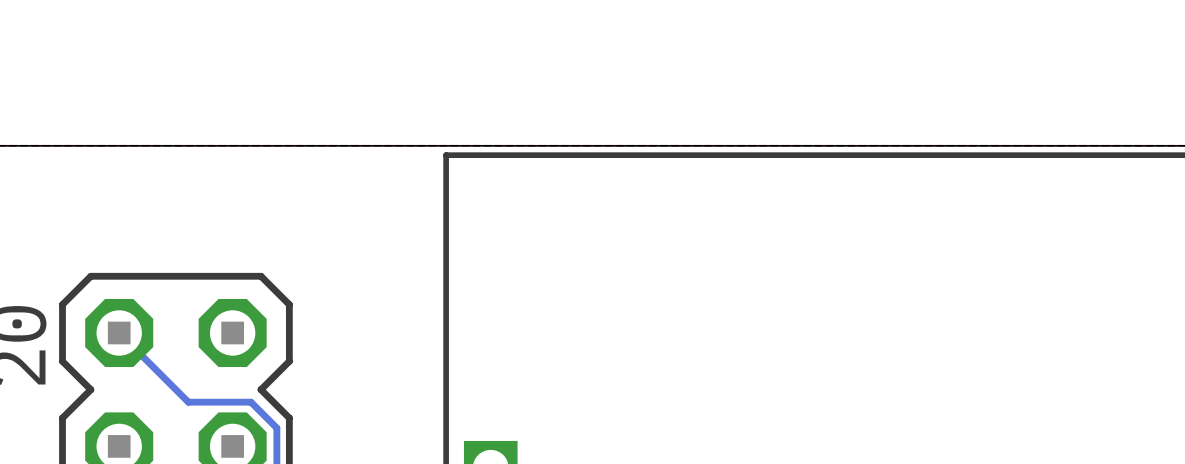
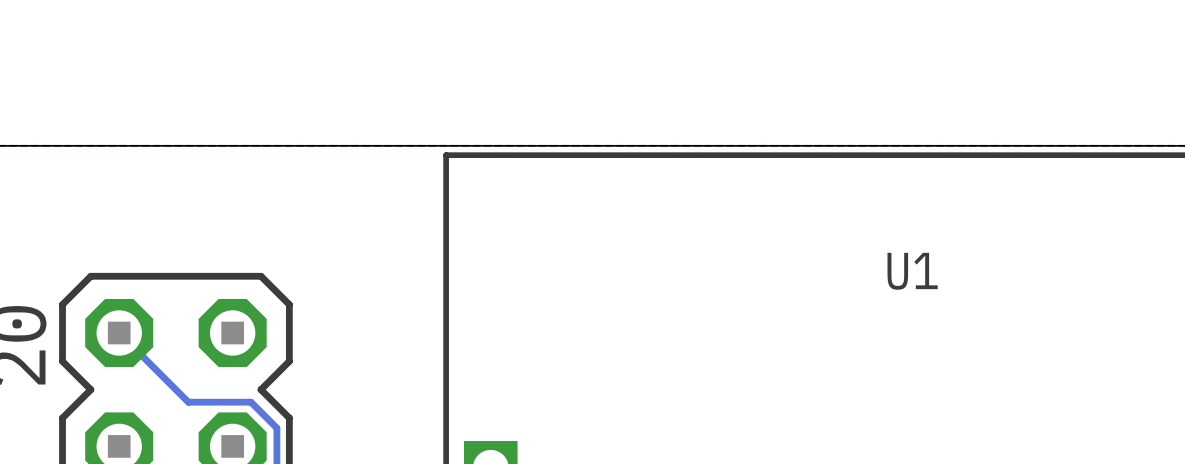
U1 name: none -> U1 (912, 271)

